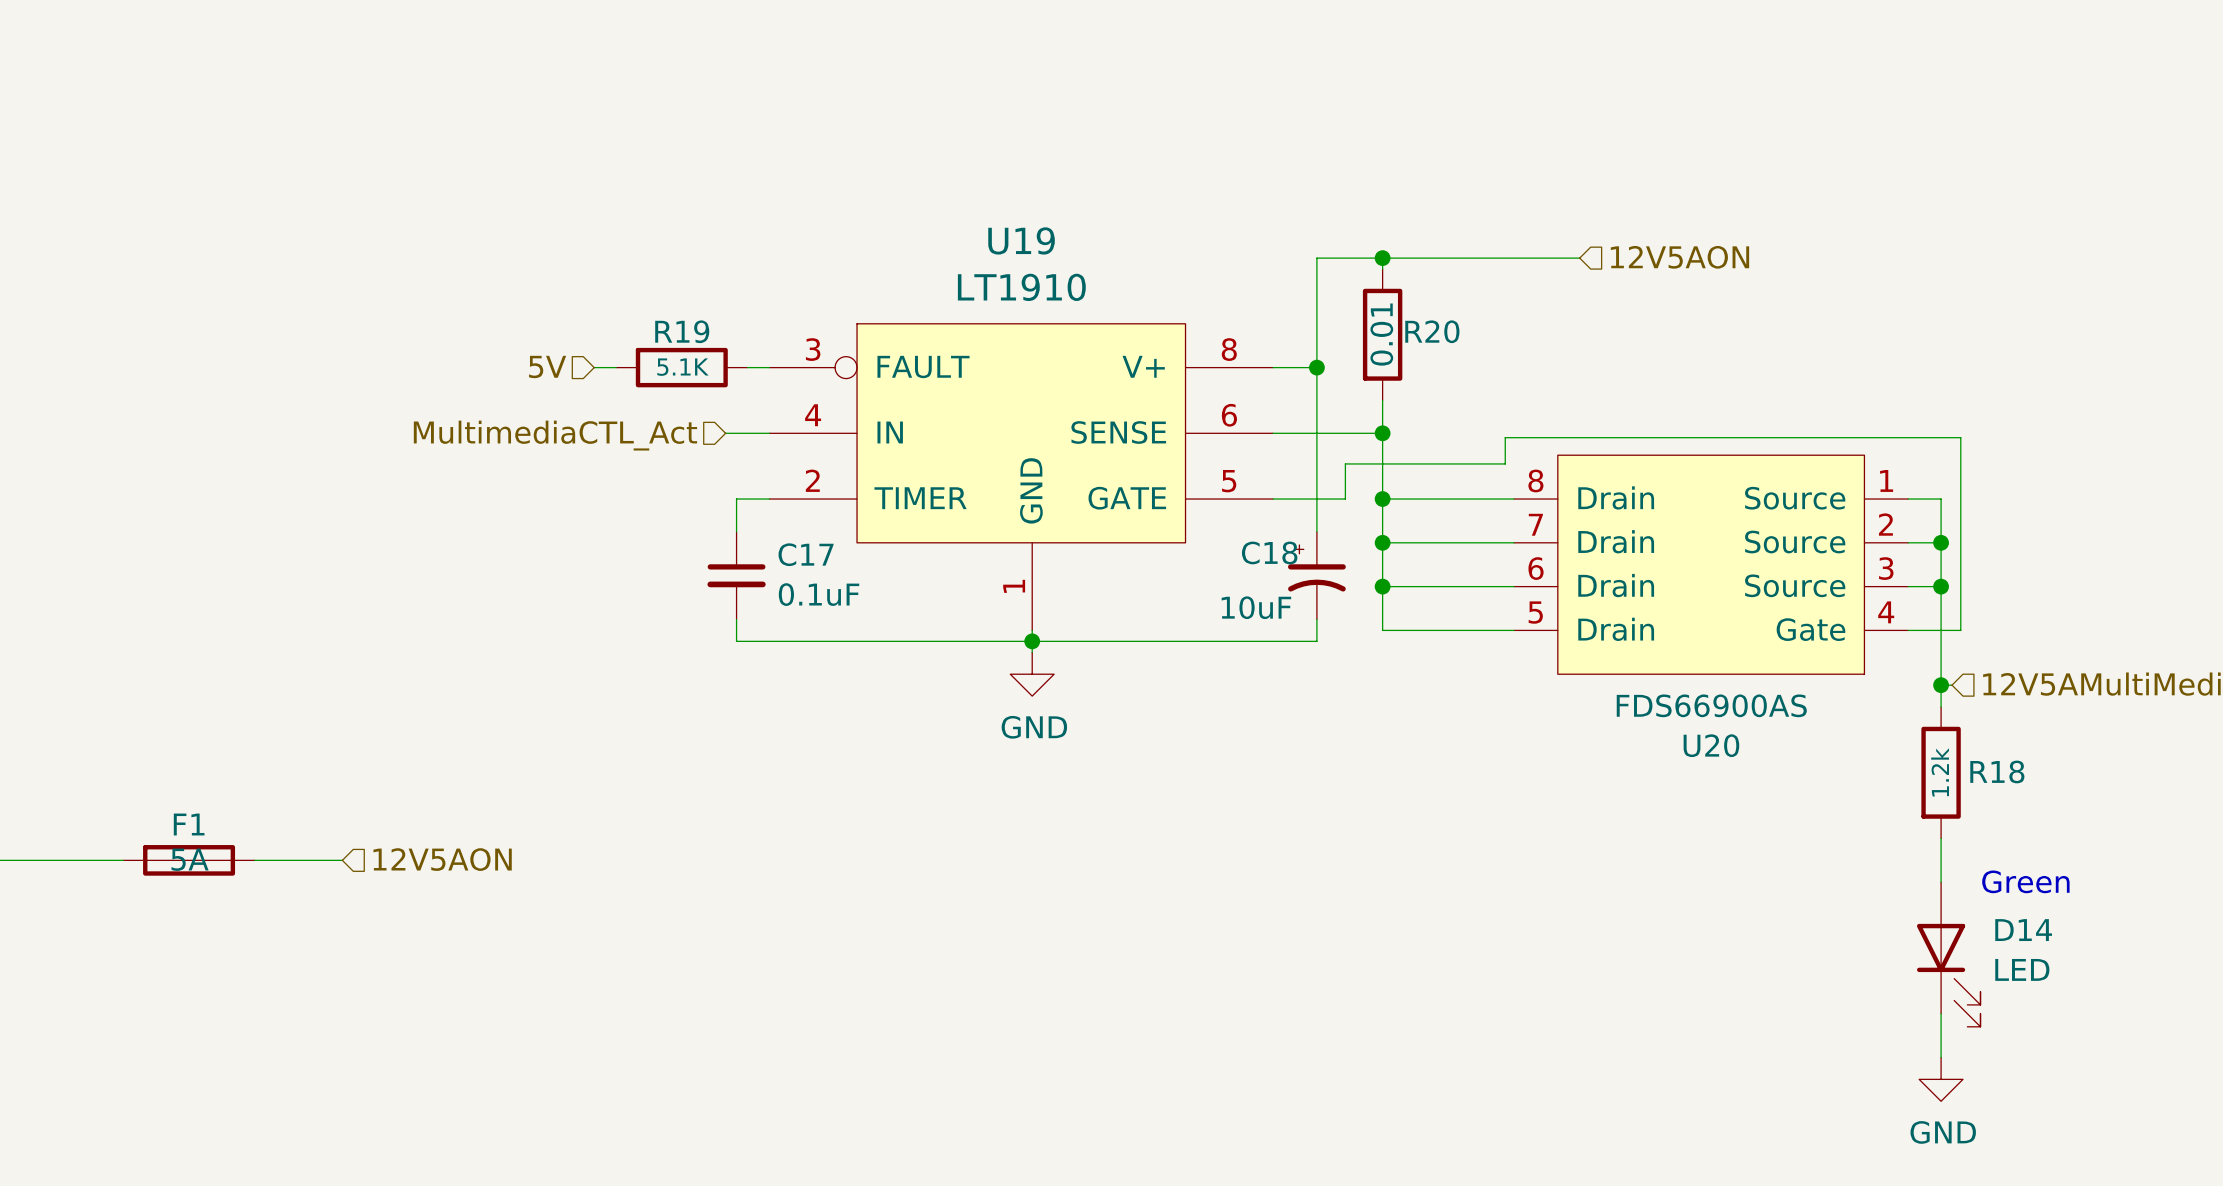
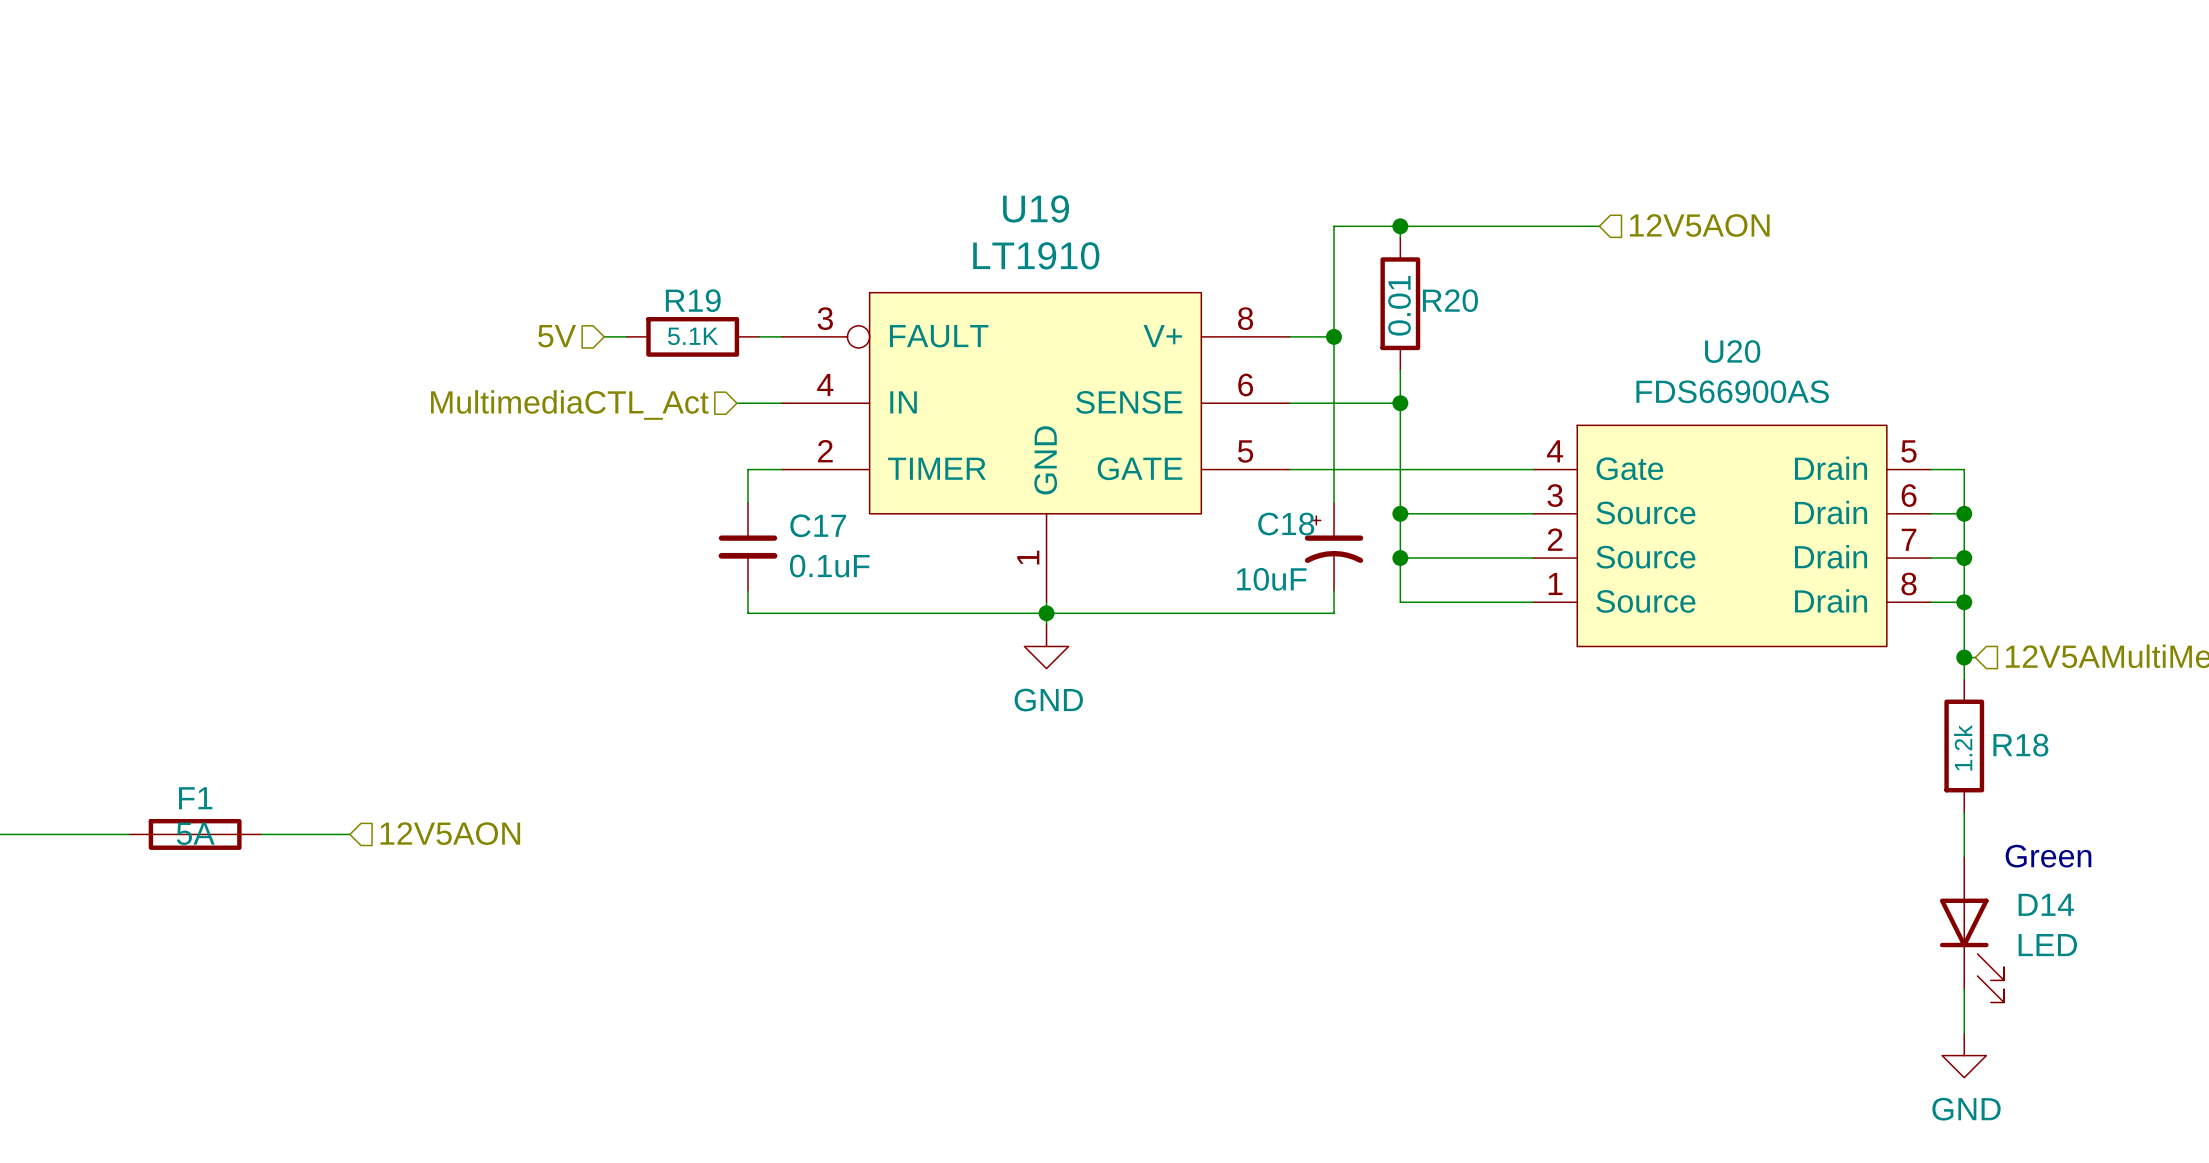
wire: (1345, 499) (1345, 463) (1505, 463) (1505, 437) (1960, 437) (1960, 630) (1941, 630) -> (1362, 469) (1400, 469)
junction: (1382, 499) -> none
U20 rotation: 0° (1711, 564) -> 180° (1732, 535)
junction: none -> (1964, 602)

